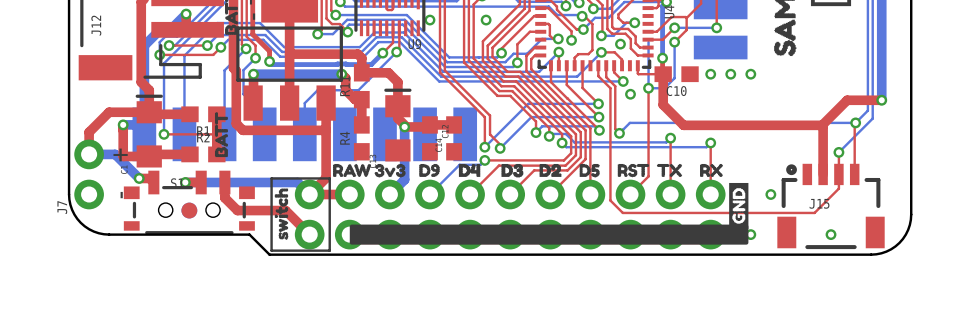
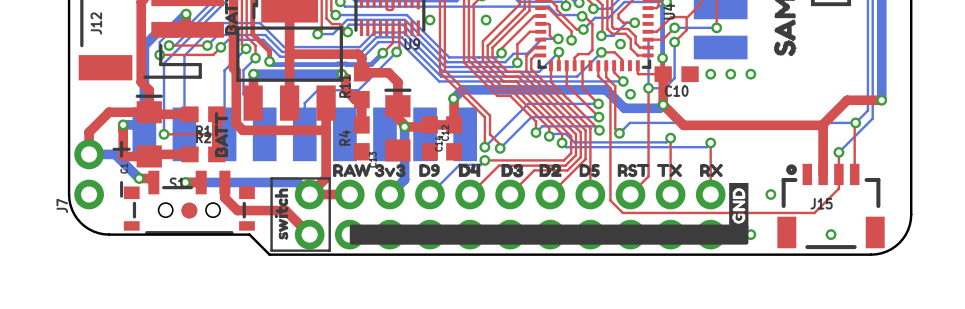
top track: none -> (453, 98) (454, 124)
bottom track: none -> (453, 98) (462, 89) (606, 89) (624, 108) (659, 108) (663, 104)
via: none -> (453, 98)
via: none -> (663, 104)

